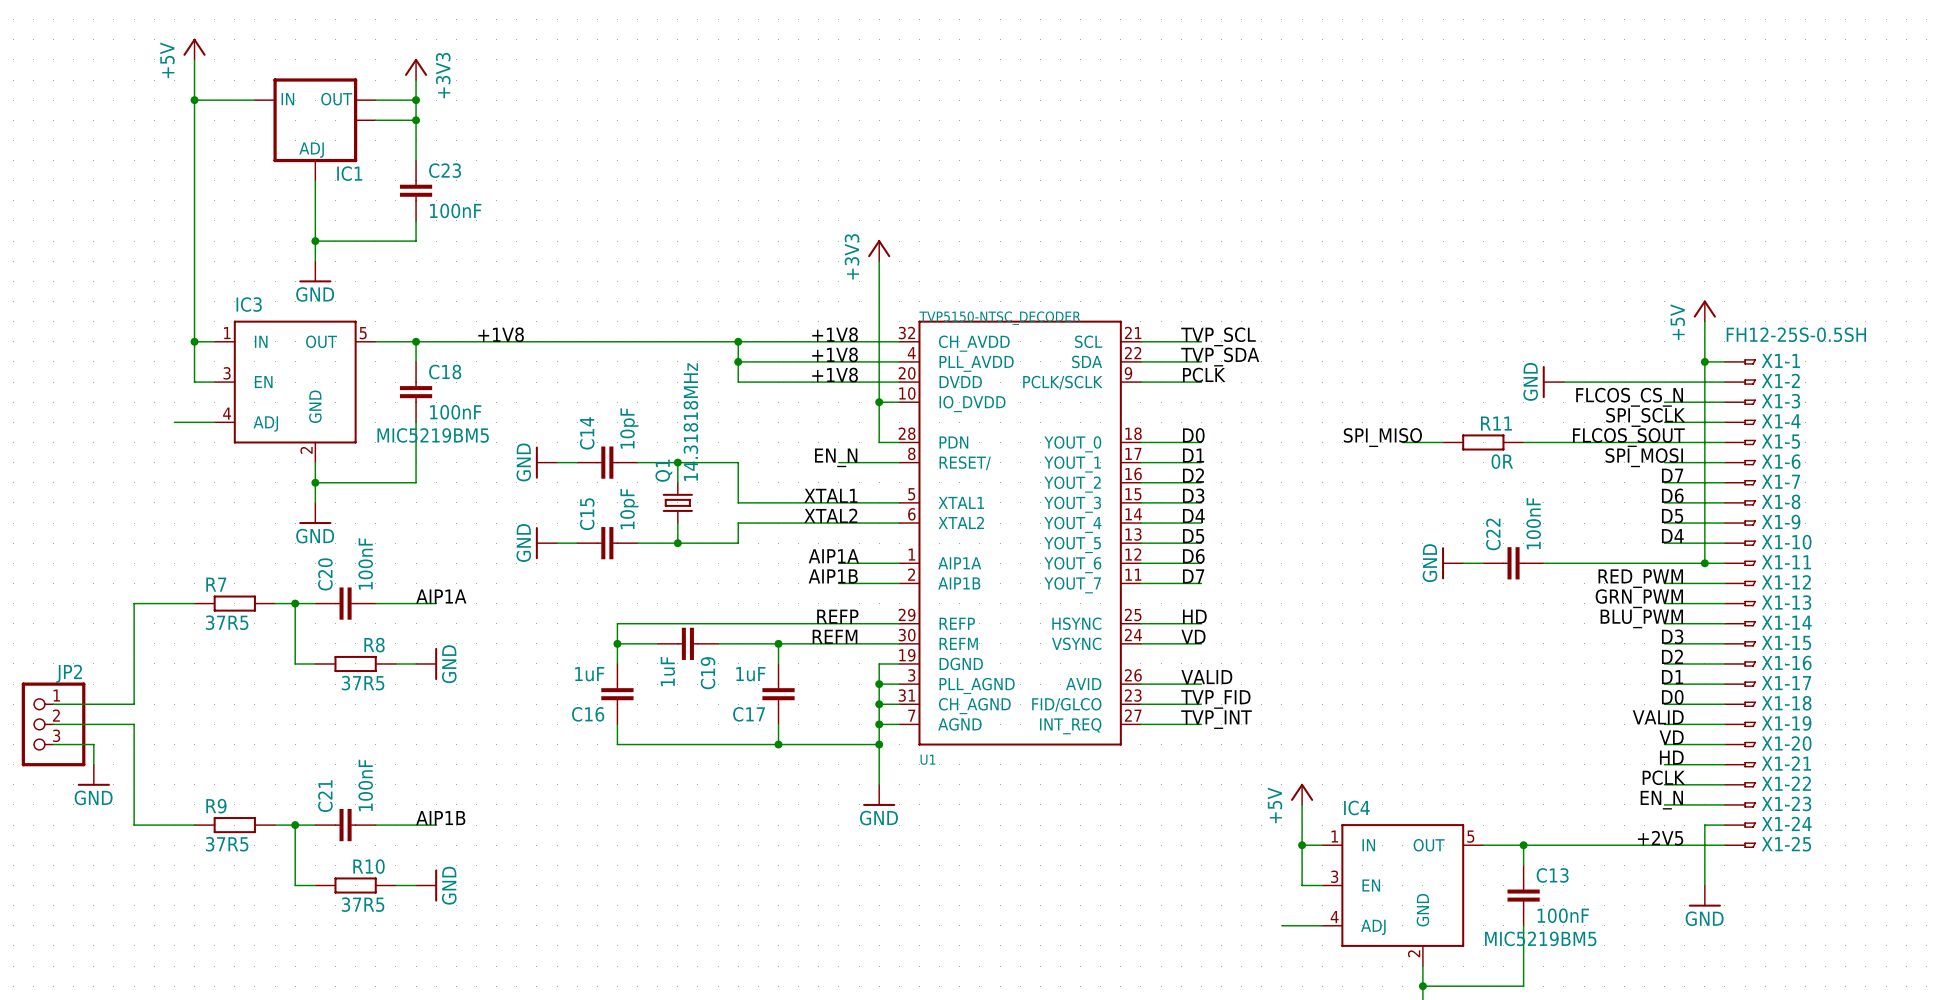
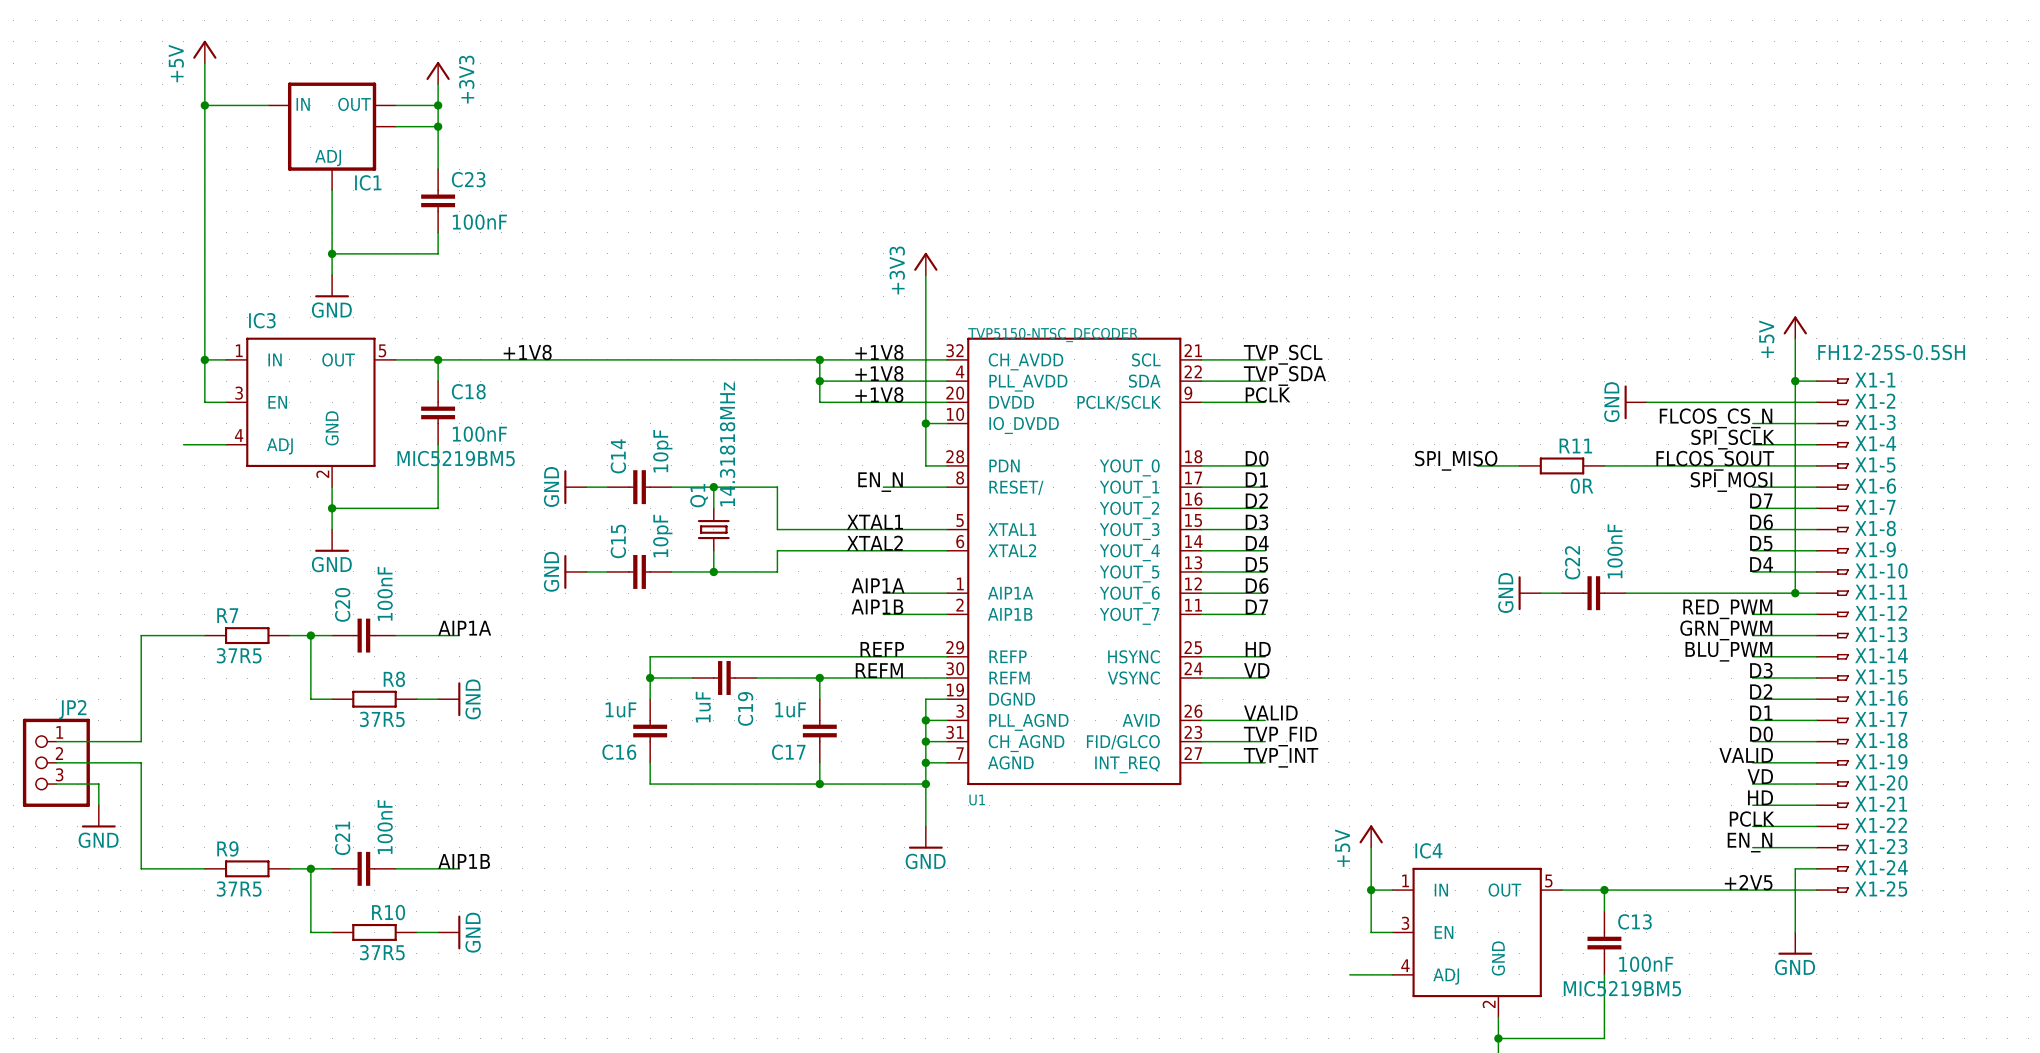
wire: (738, 341) (738, 382) (778, 382) -> (819, 359) (819, 402)
junction: (738, 341) -> none
junction: none -> (819, 359)
wire: (738, 361) (778, 361) -> none
junction: (738, 361) -> none
junction: none -> (819, 381)

